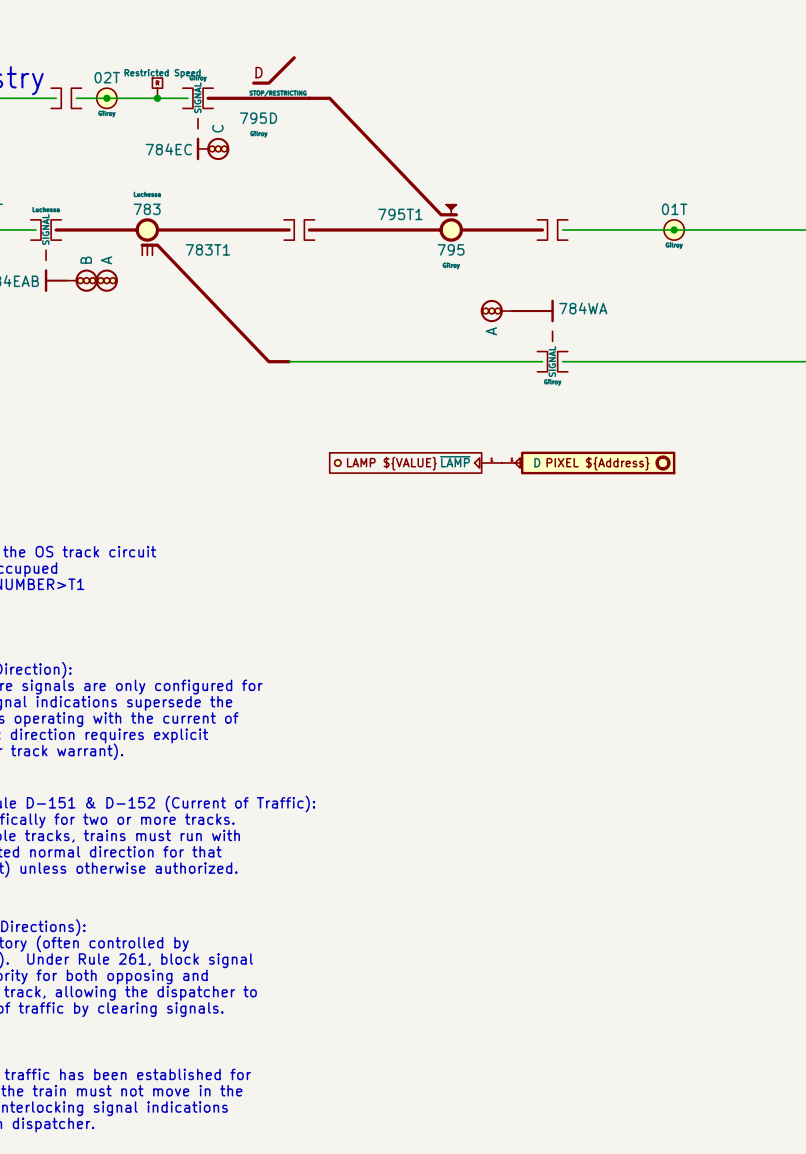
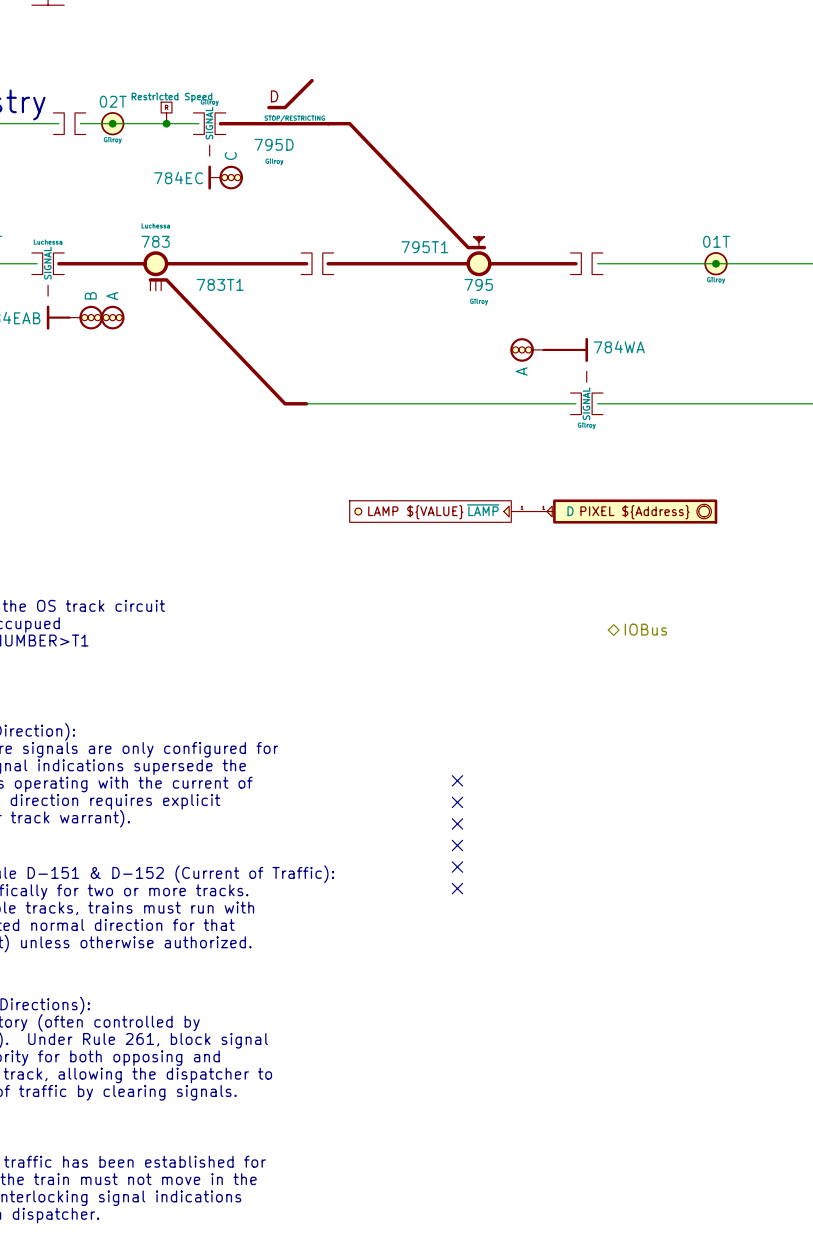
hierarchical label: none -> IOBus (645, 629)
no-connect mark: none -> (457, 780)
no-connect mark: none -> (457, 802)
no-connect mark: none -> (457, 823)
no-connect mark: none -> (457, 845)
no-connect mark: none -> (457, 867)
no-connect mark: none -> (457, 888)

